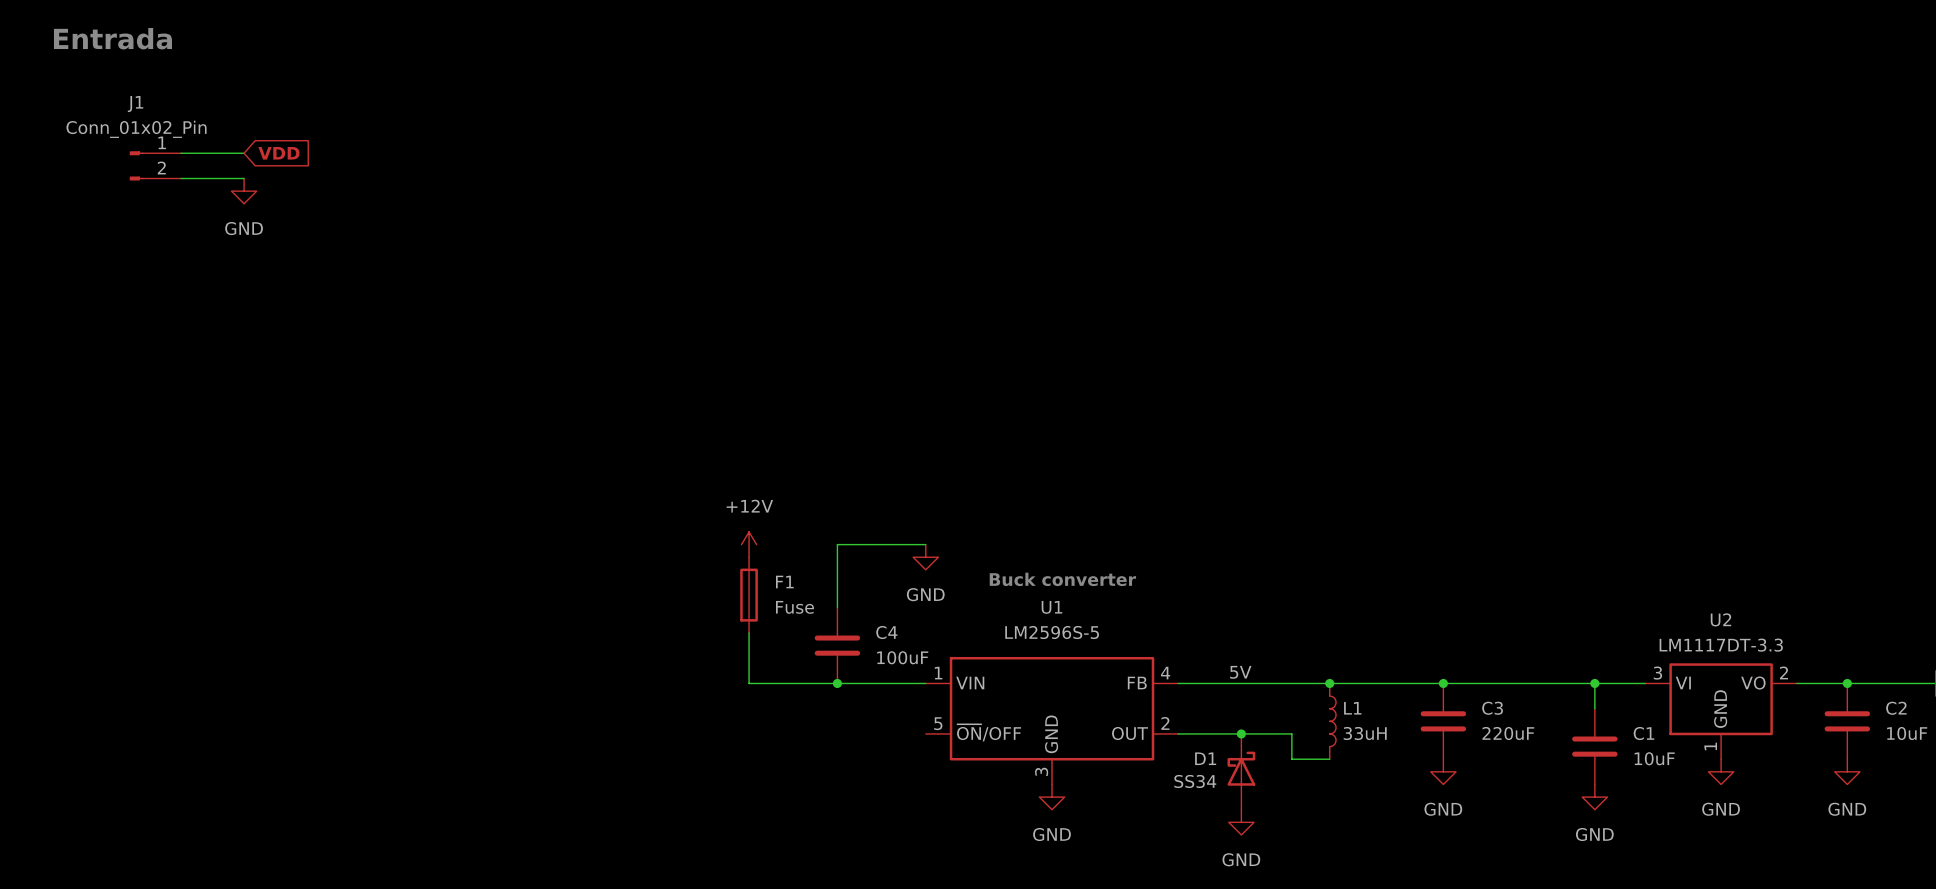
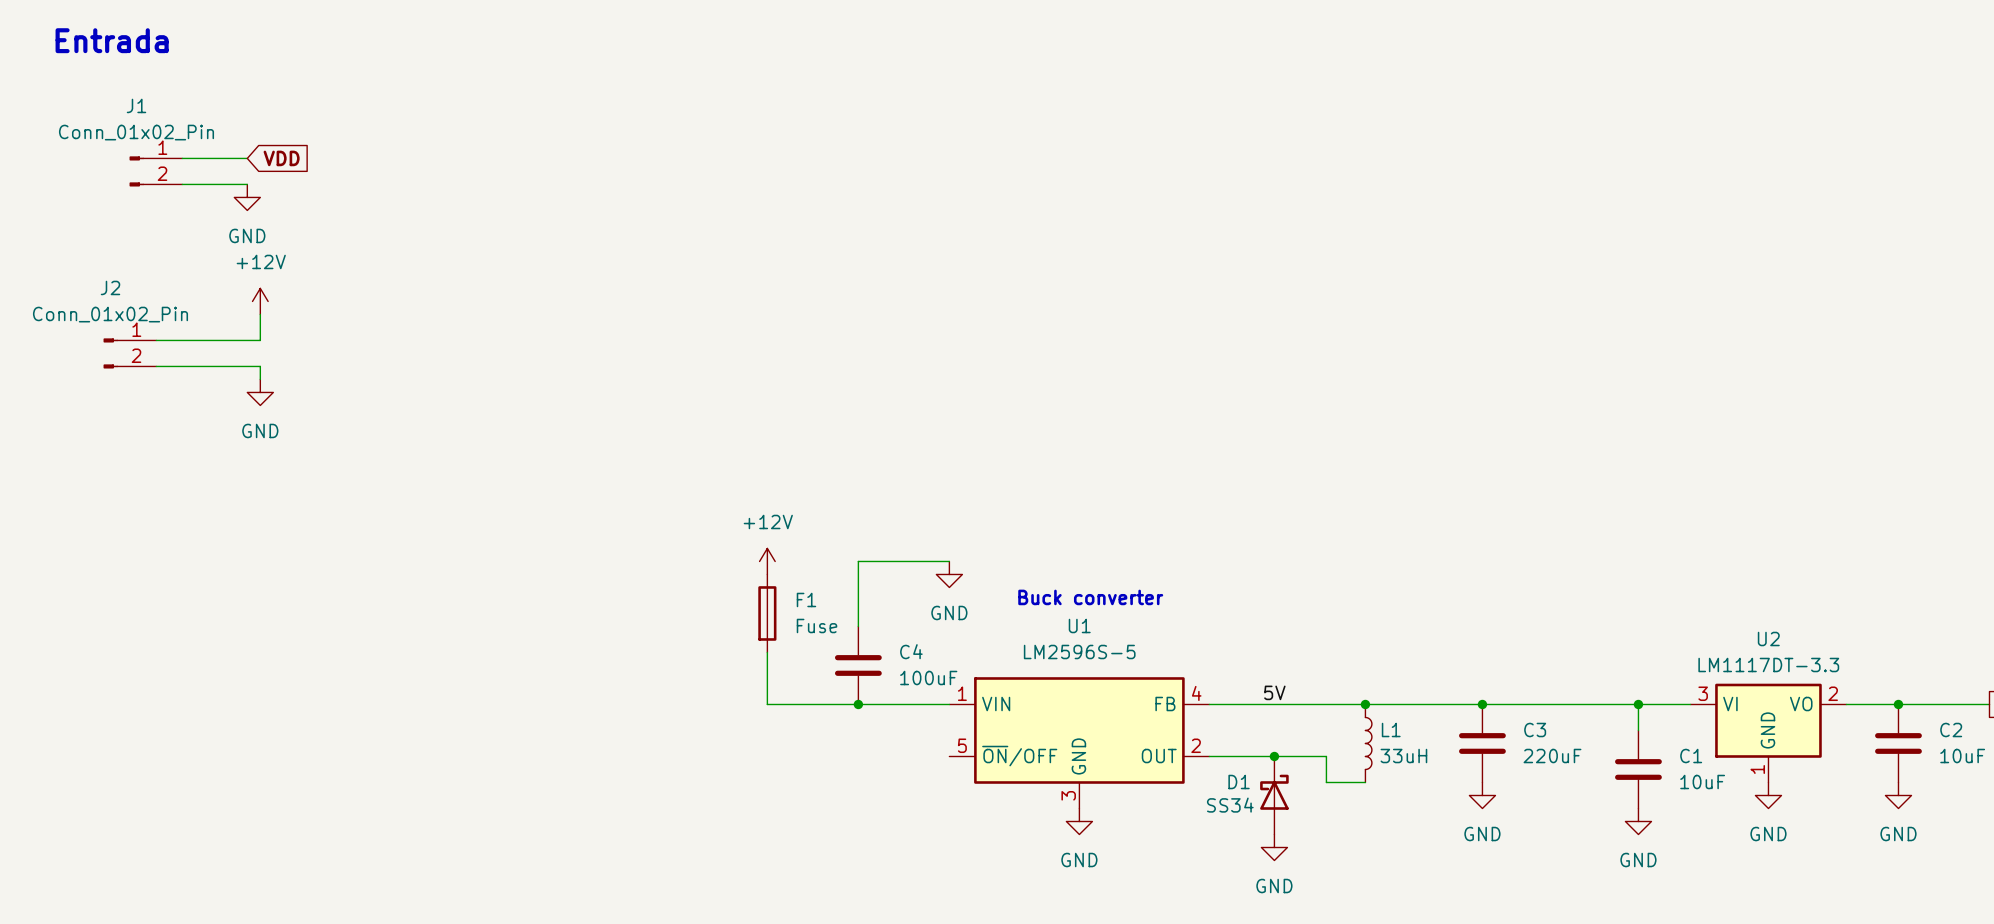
power symbol: none -> +12V (260, 301)
wire: none -> (260, 314) (260, 340) (156, 340)
J2: none -> Conn_01x02_Pin (129, 353)
wire: none -> (156, 366) (260, 366) (260, 379)
power symbol: none -> GND (260, 392)

